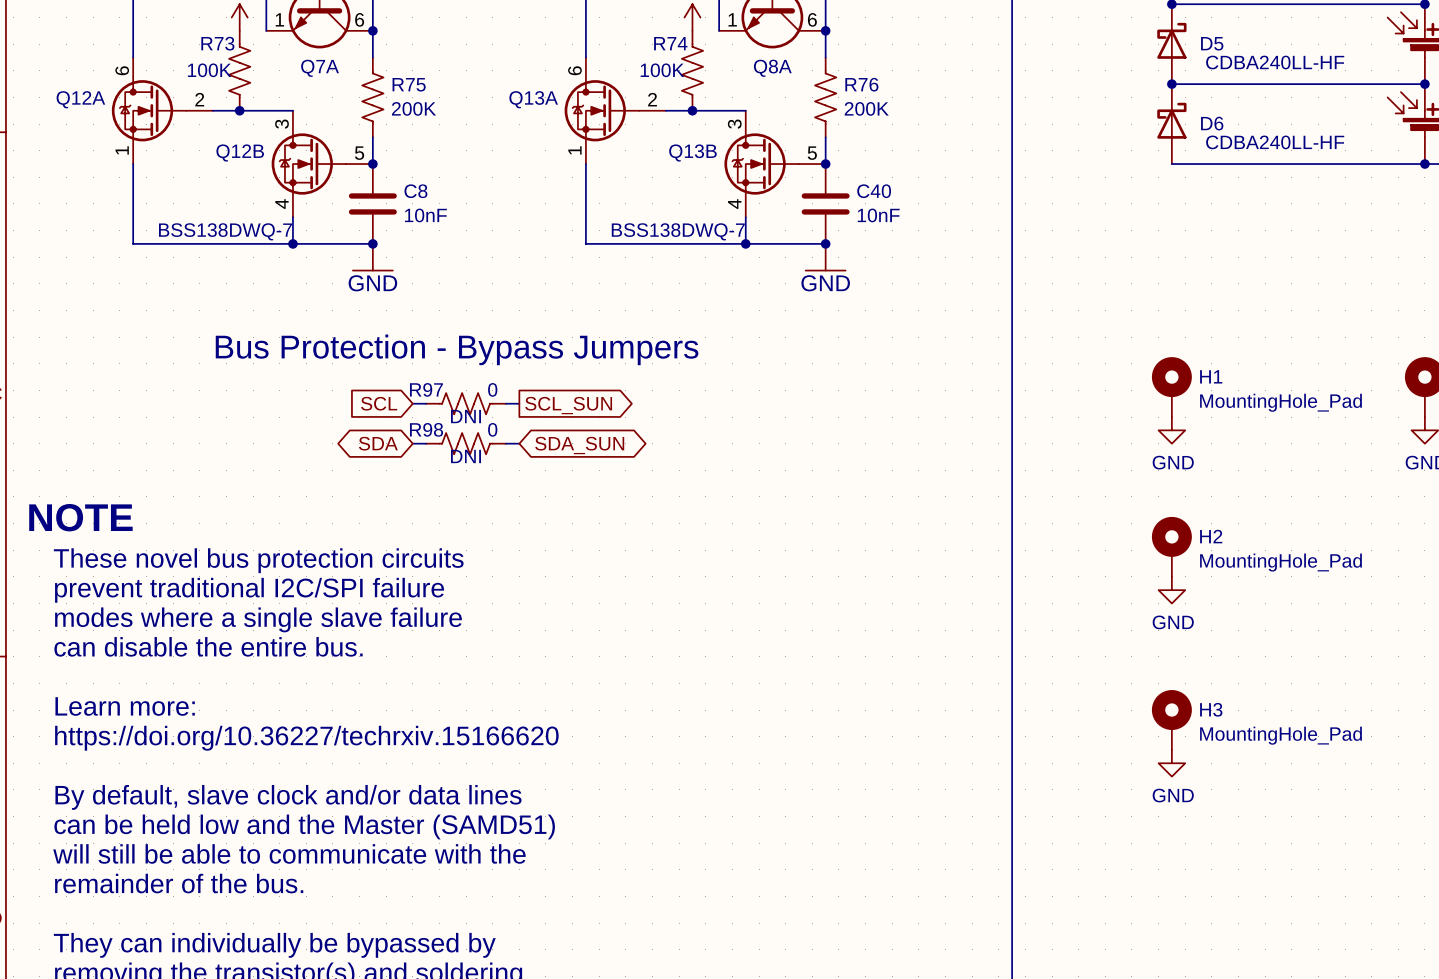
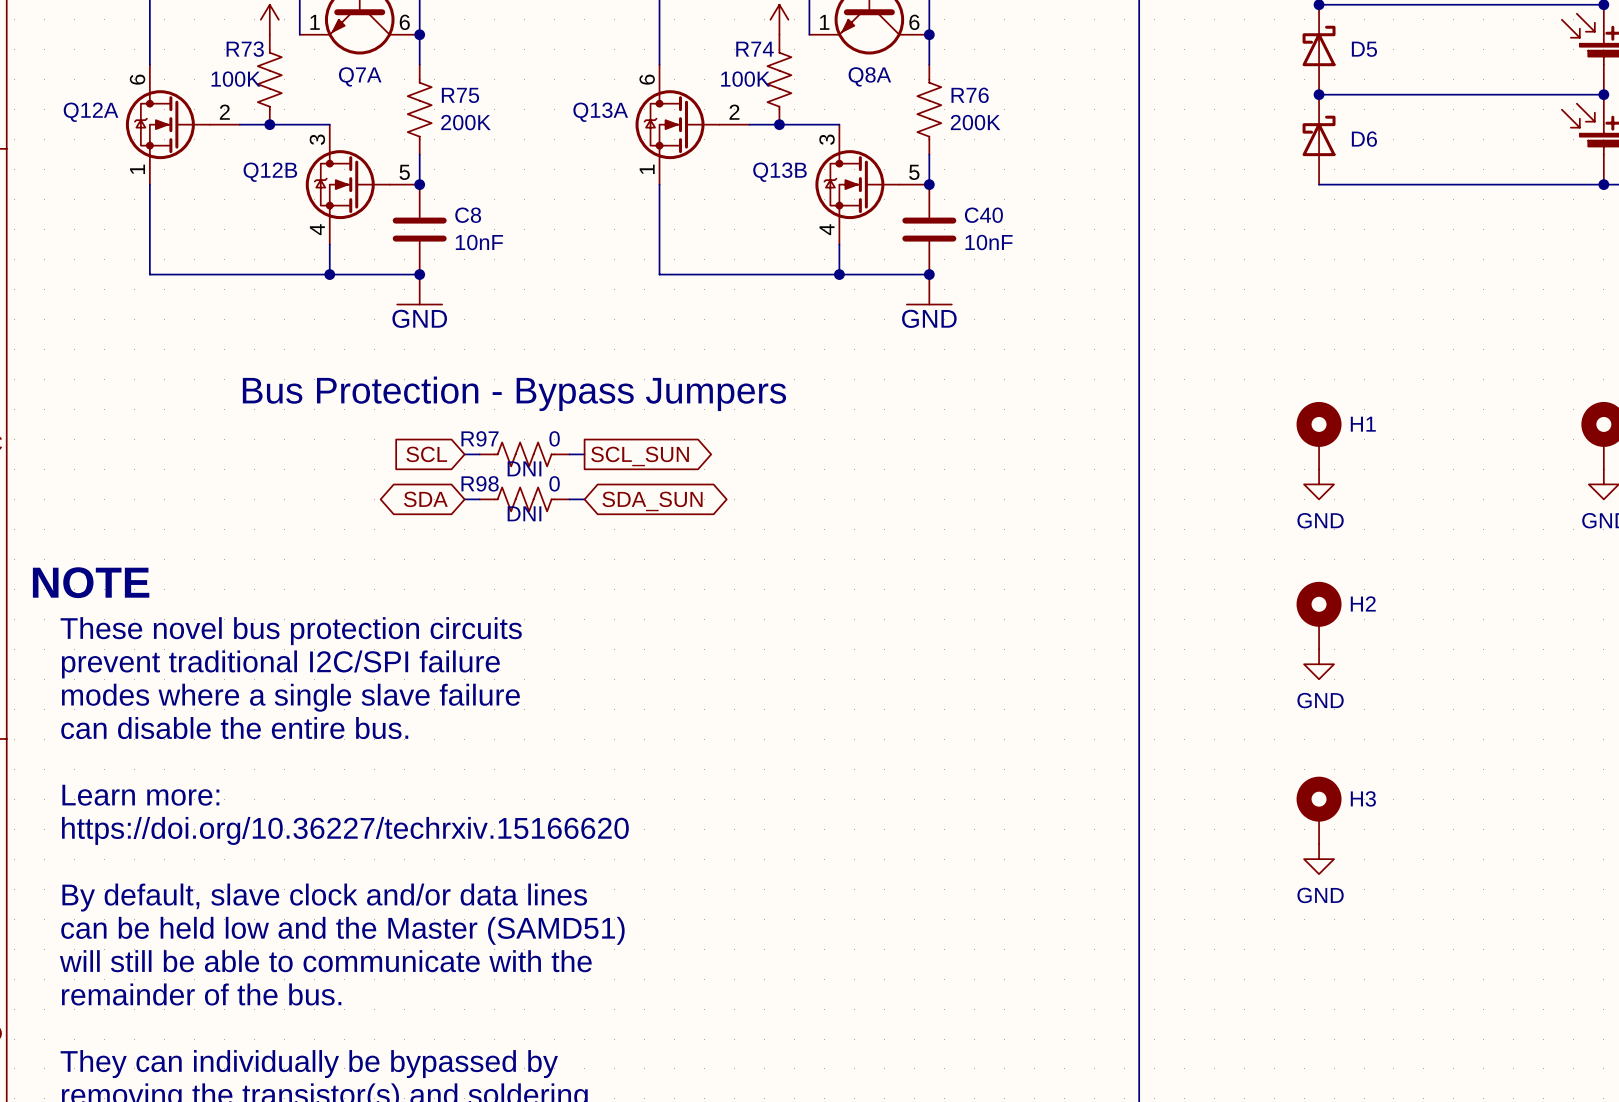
D5 value: CDBA240LL-HF (1275, 62) -> none
D6 value: CDBA240LL-HF (1275, 142) -> none
Q12A value: BSS138DWQ-7 (225, 231) -> none
Q13A value: BSS138DWQ-7 (678, 231) -> none
H1 value: MountingHole_Pad (1281, 402) -> none
H2 value: MountingHole_Pad (1281, 562) -> none
H3 value: MountingHole_Pad (1281, 735) -> none

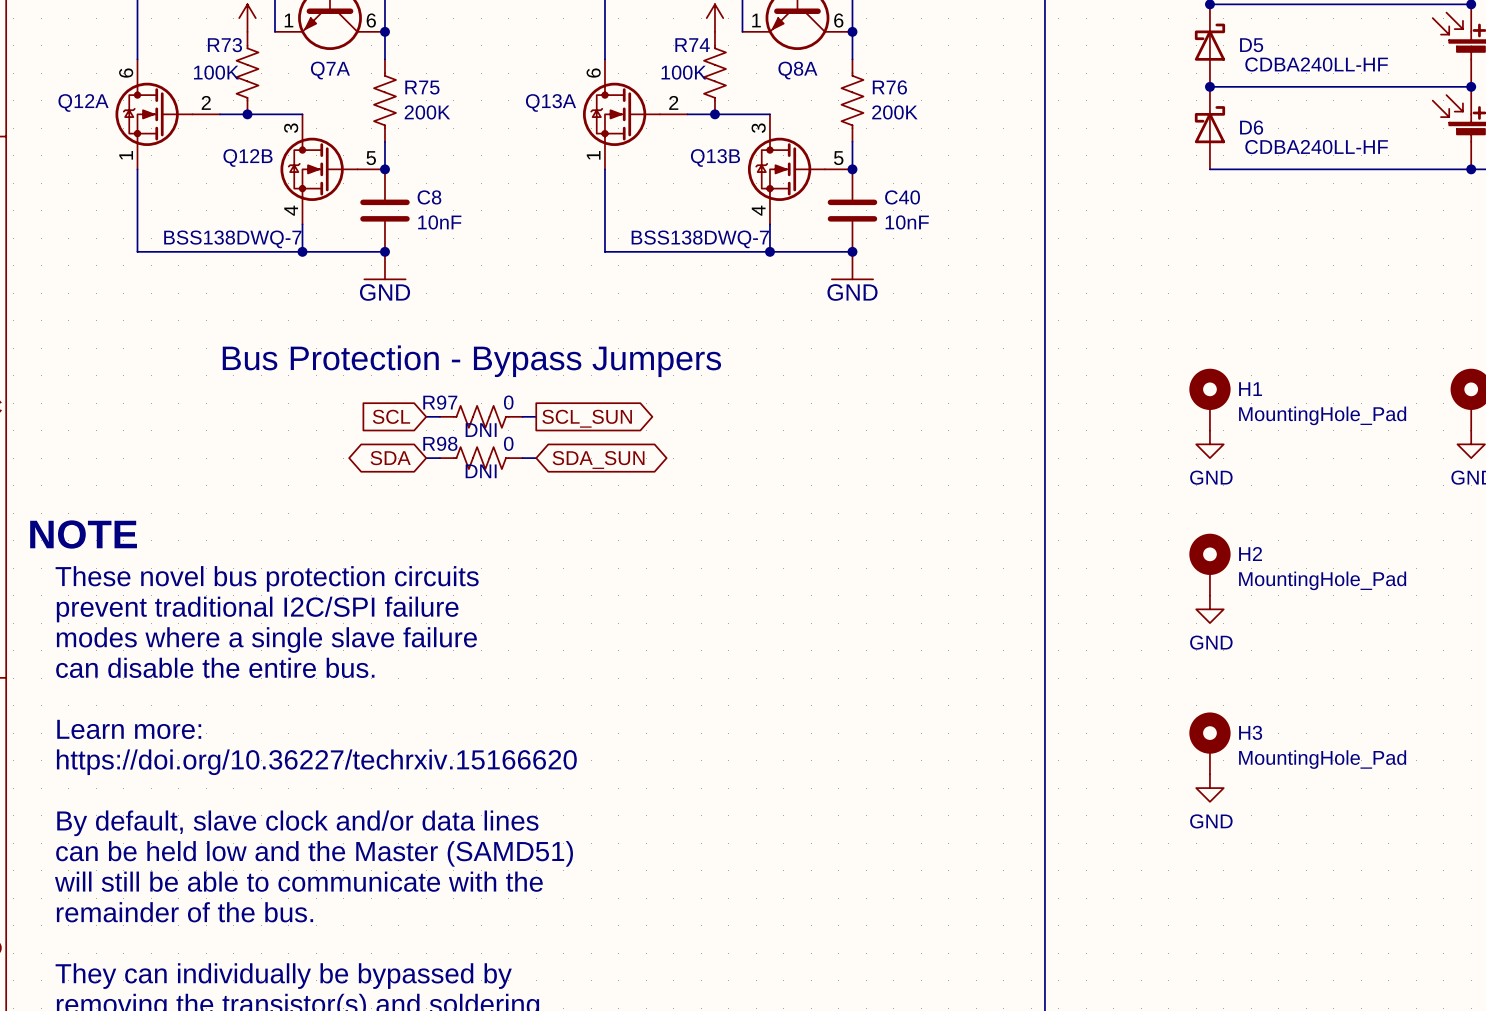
D5 value: none -> CDBA240LL-HF (1316, 64)
D6 value: none -> CDBA240LL-HF (1316, 147)
Q12A value: none -> BSS138DWQ-7 (232, 239)
Q13A value: none -> BSS138DWQ-7 (700, 239)
H1 value: none -> MountingHole_Pad (1322, 415)
H2 value: none -> MountingHole_Pad (1322, 580)
H3 value: none -> MountingHole_Pad (1322, 759)

